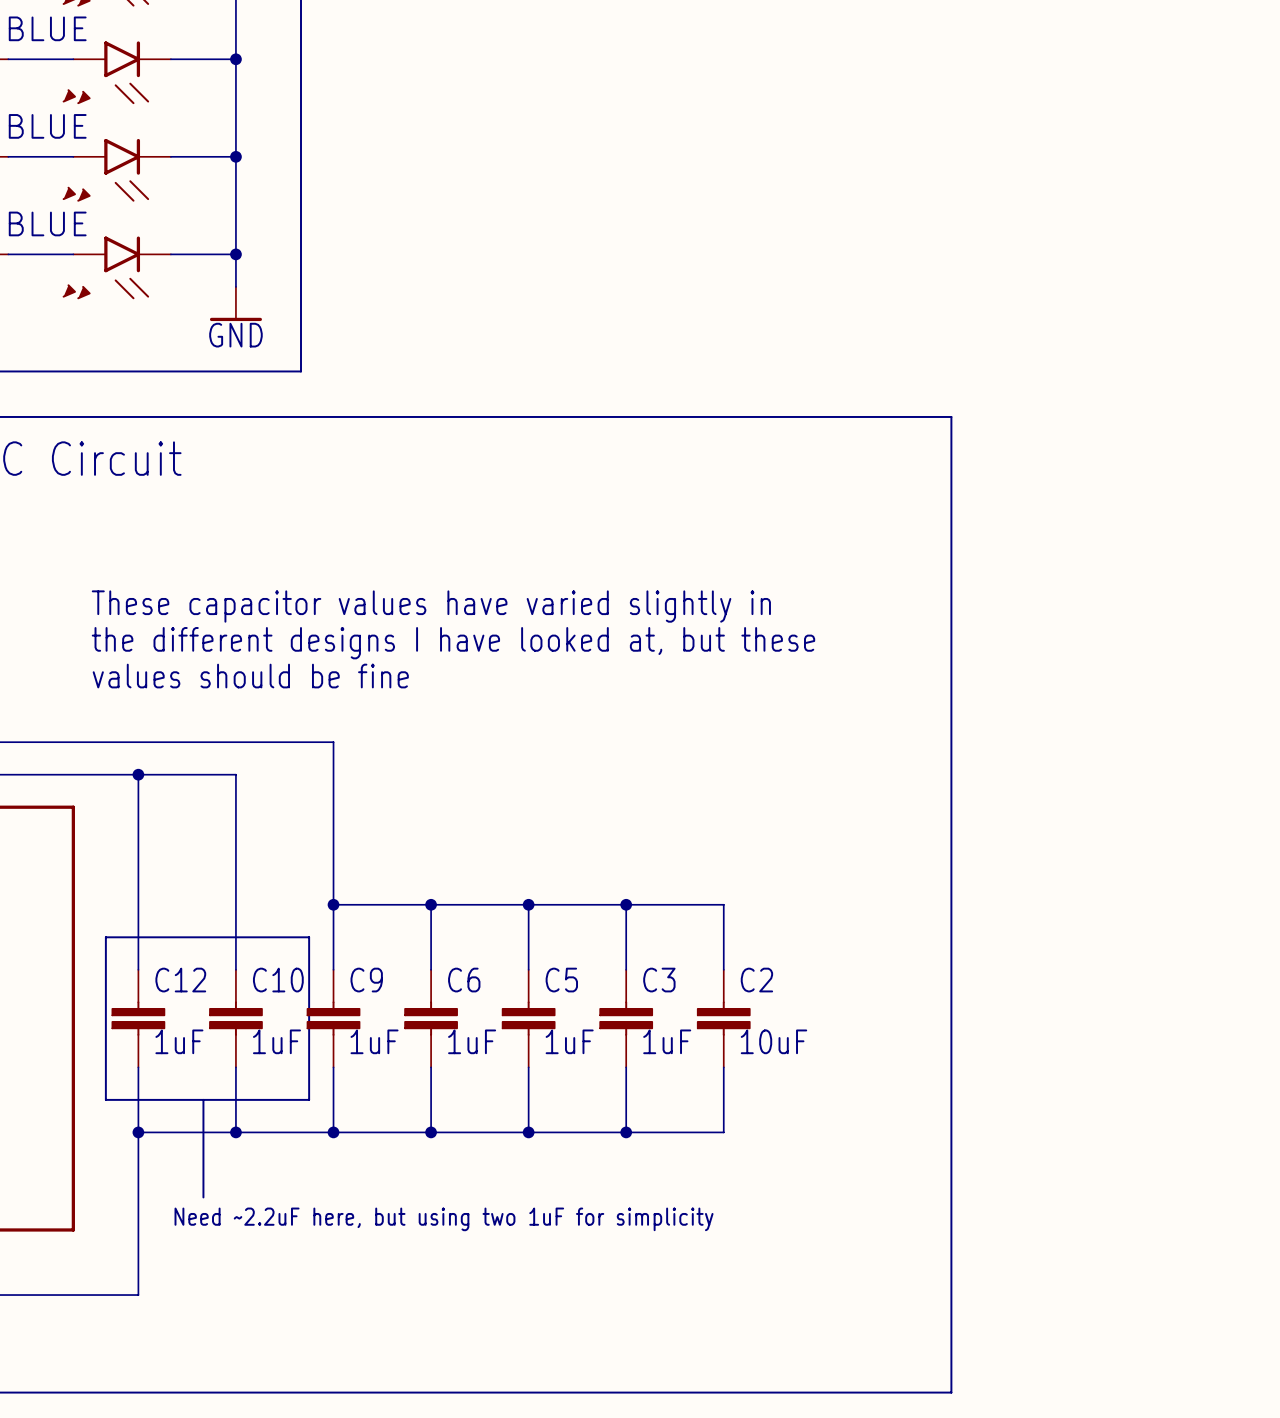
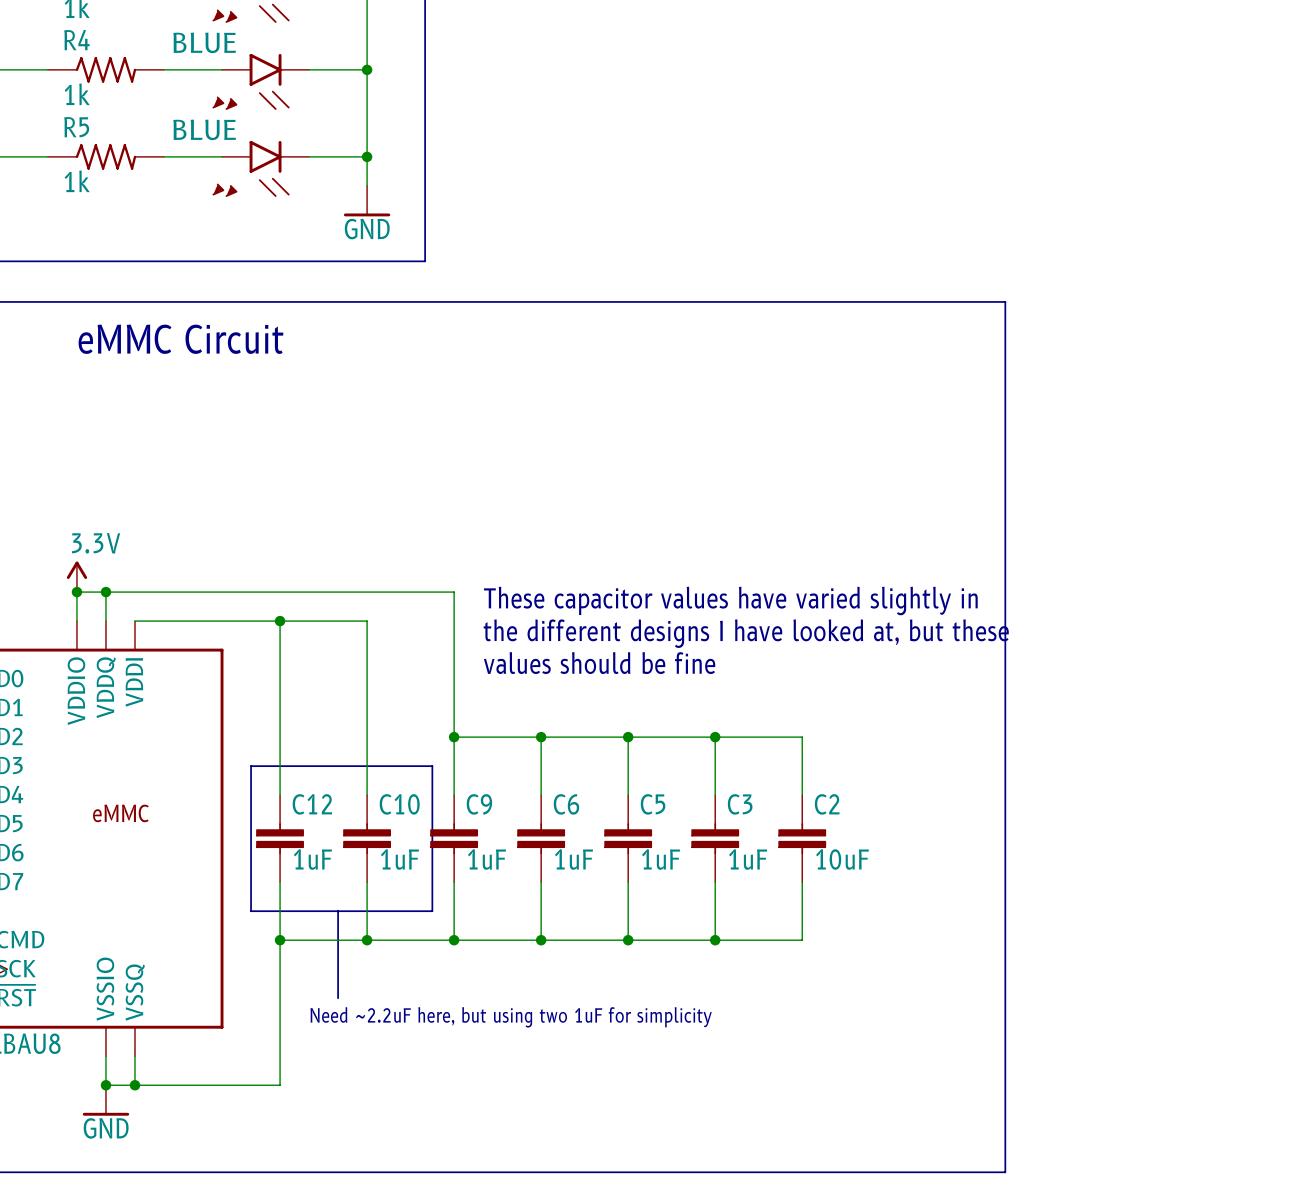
text position: These capacitor values have varied slightly in (431, 606) -> These capacitor values have varied slightly in (730, 601)
text position: the different designs I have looked at, but these (453, 643) -> the different designs I have looked at, but these (746, 633)
text position: values should be fine (250, 676) -> values should be fine (599, 663)

